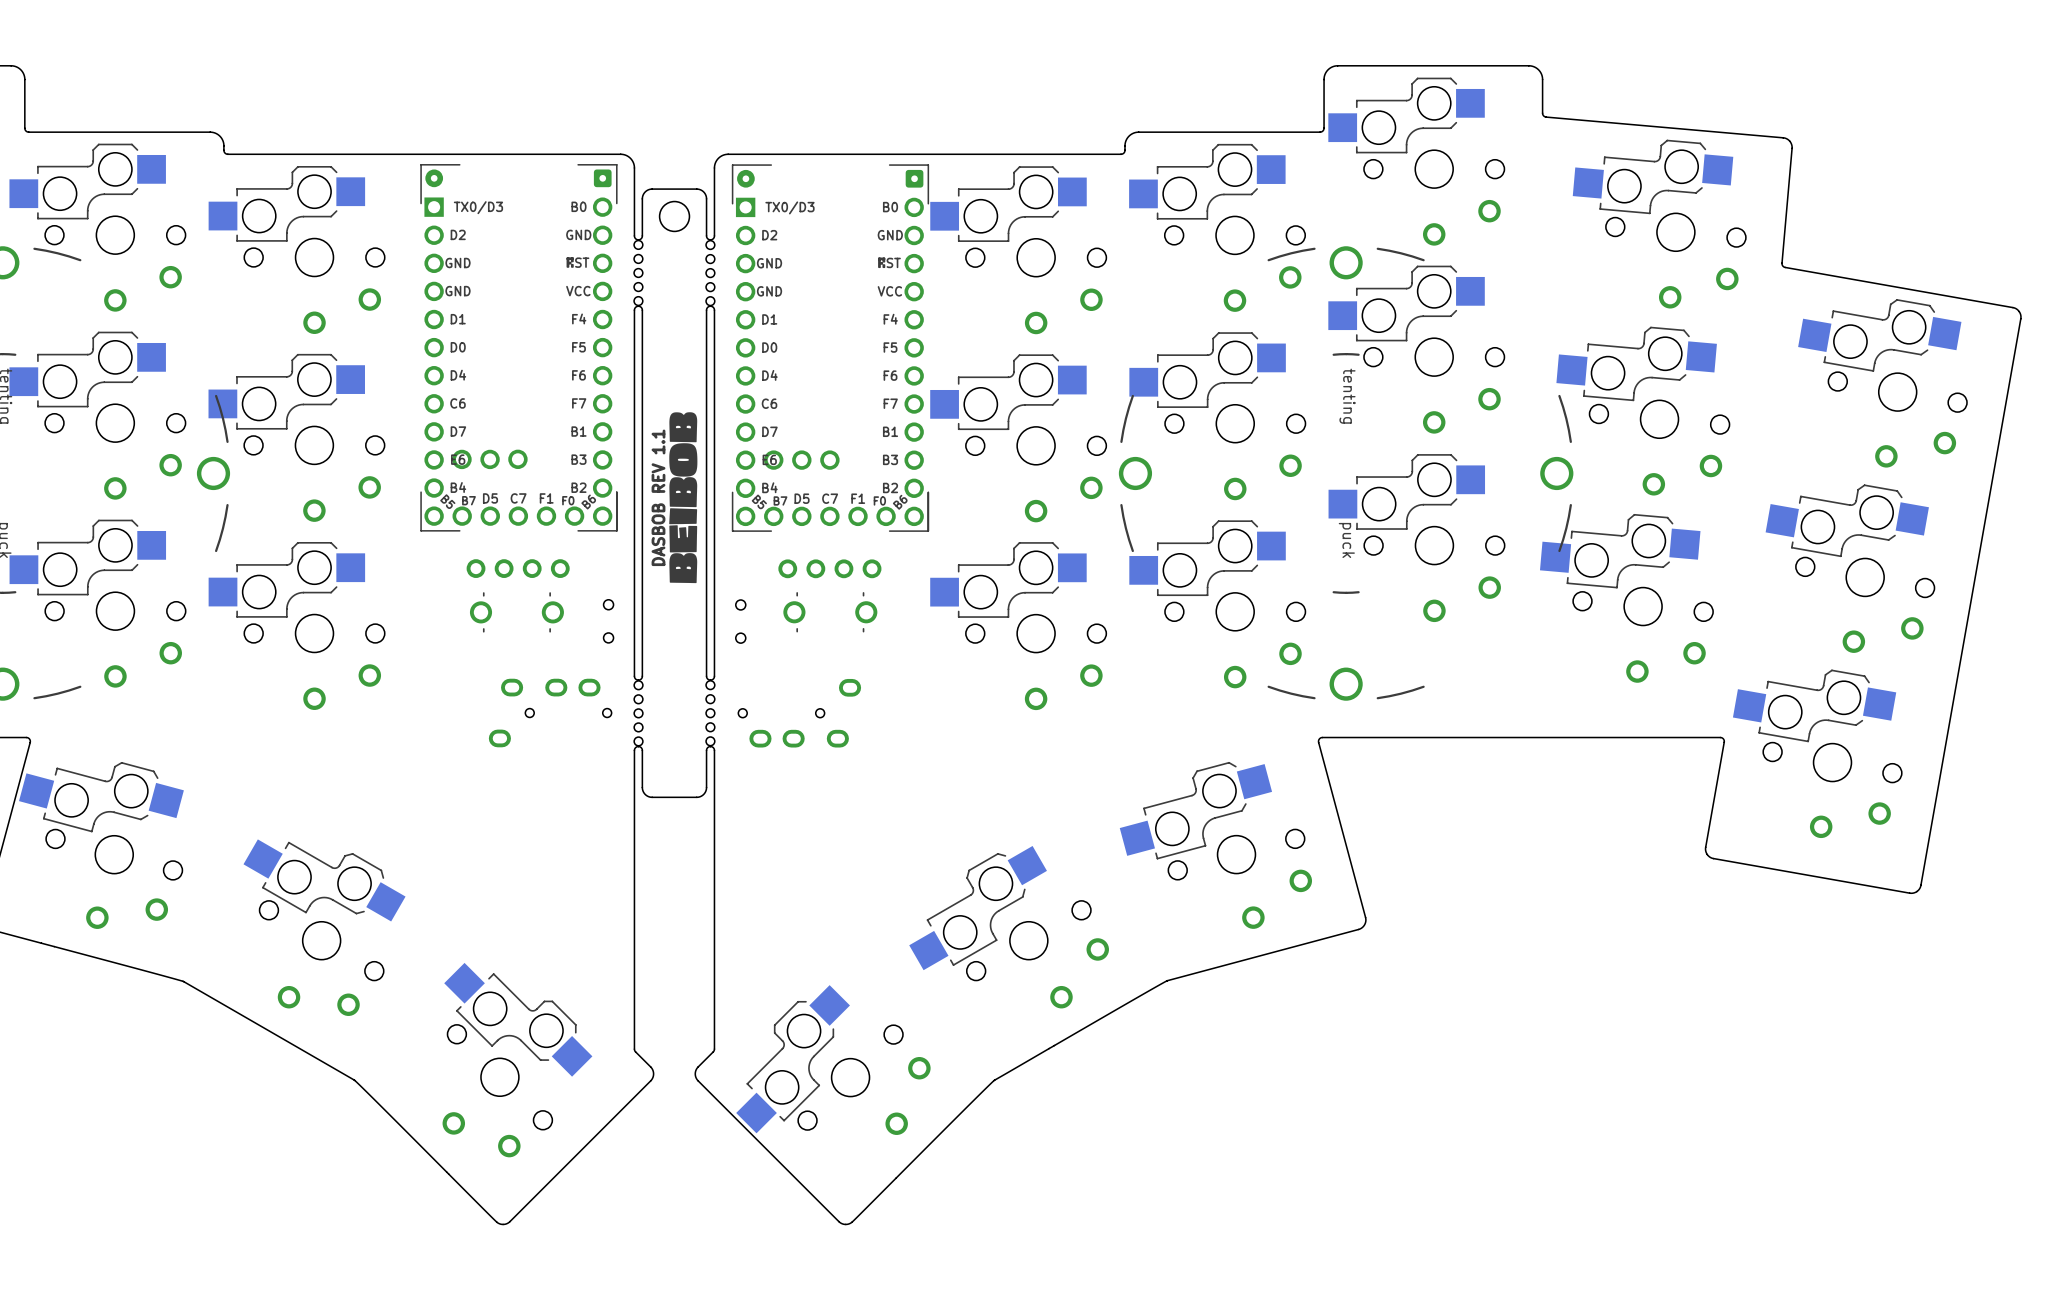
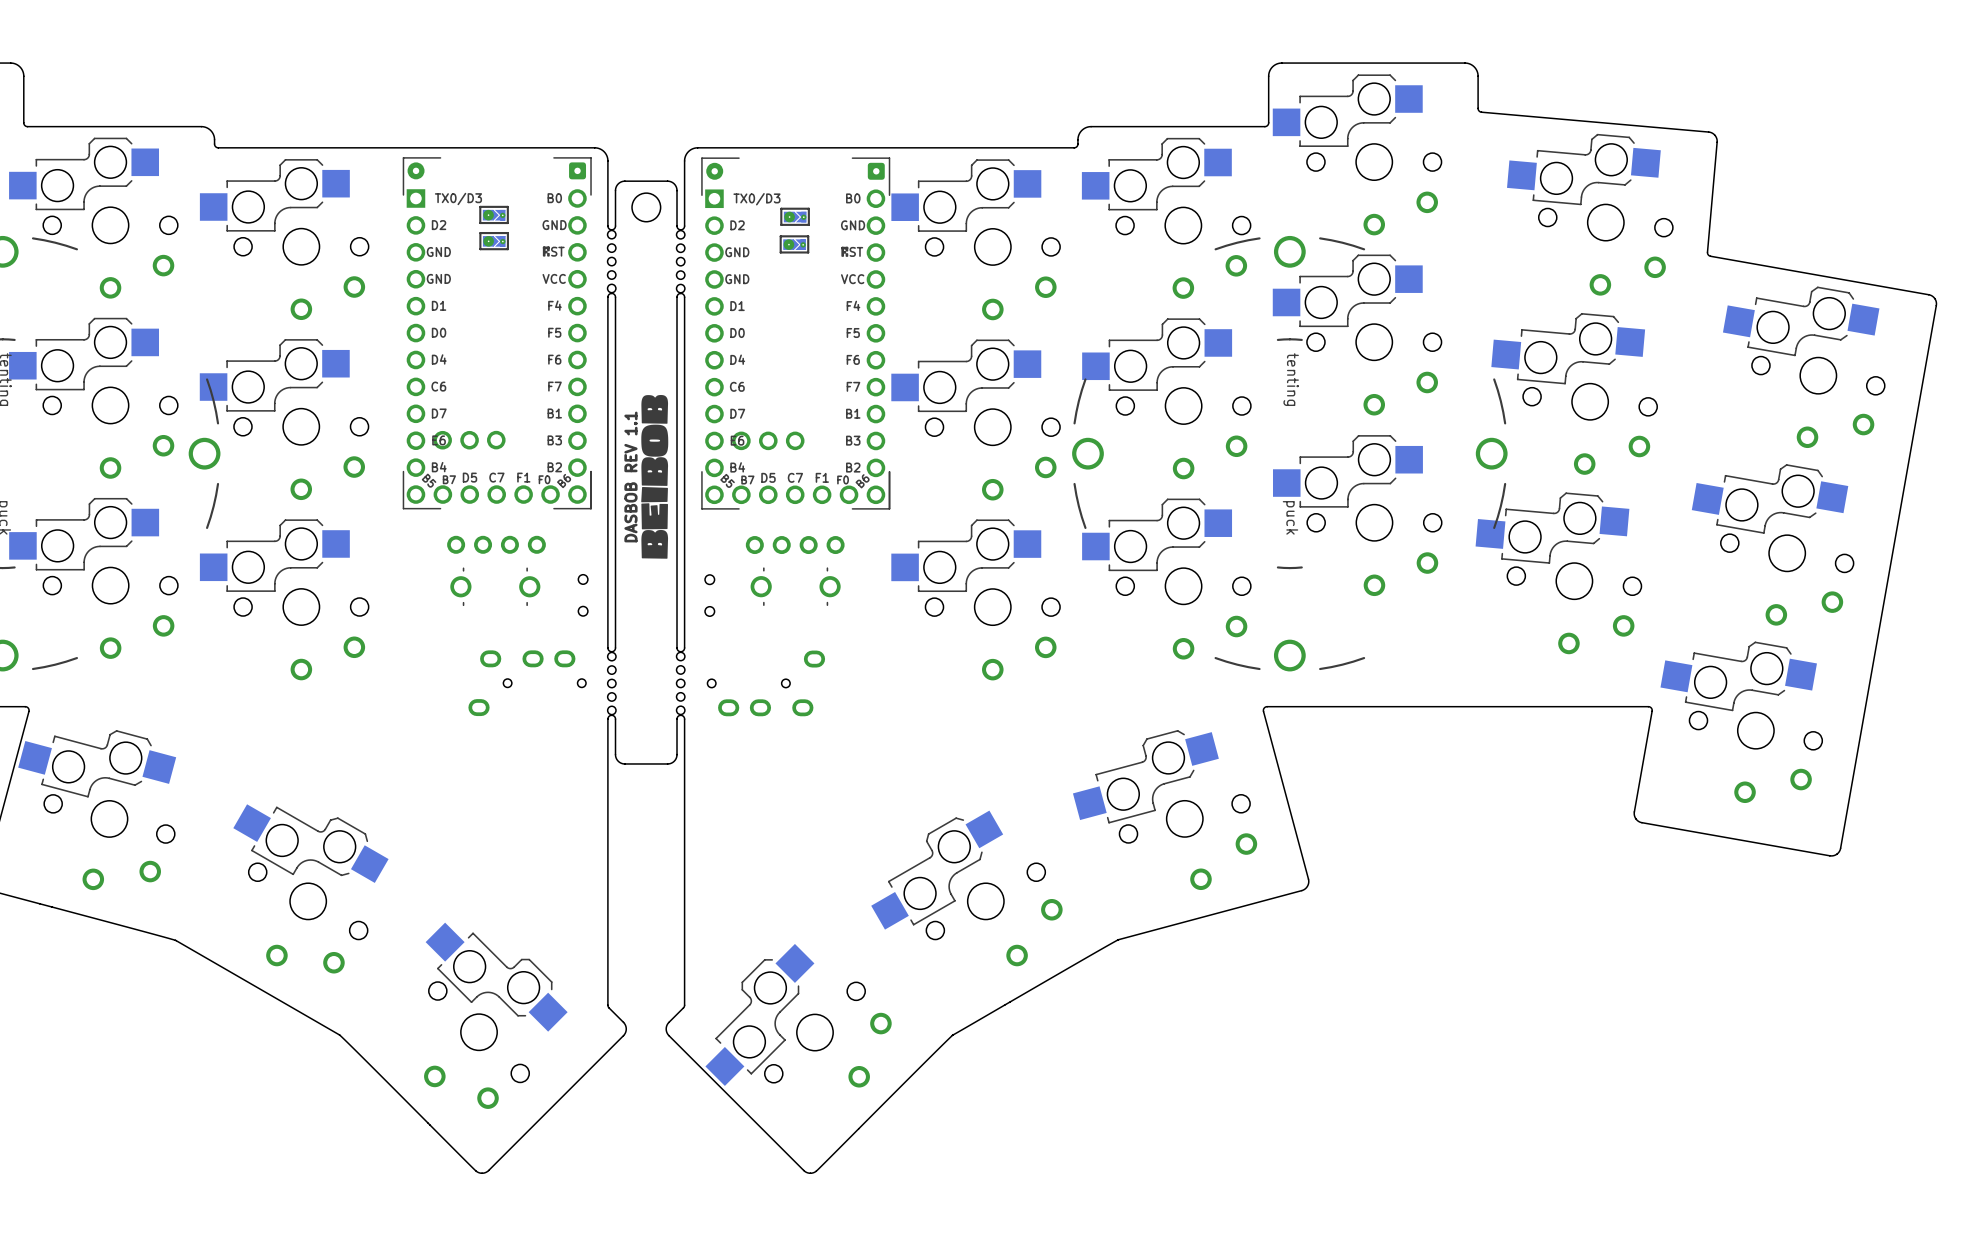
part: none -> (494, 214)
part: none -> (795, 216)
part: none -> (494, 241)
part: none -> (794, 244)

